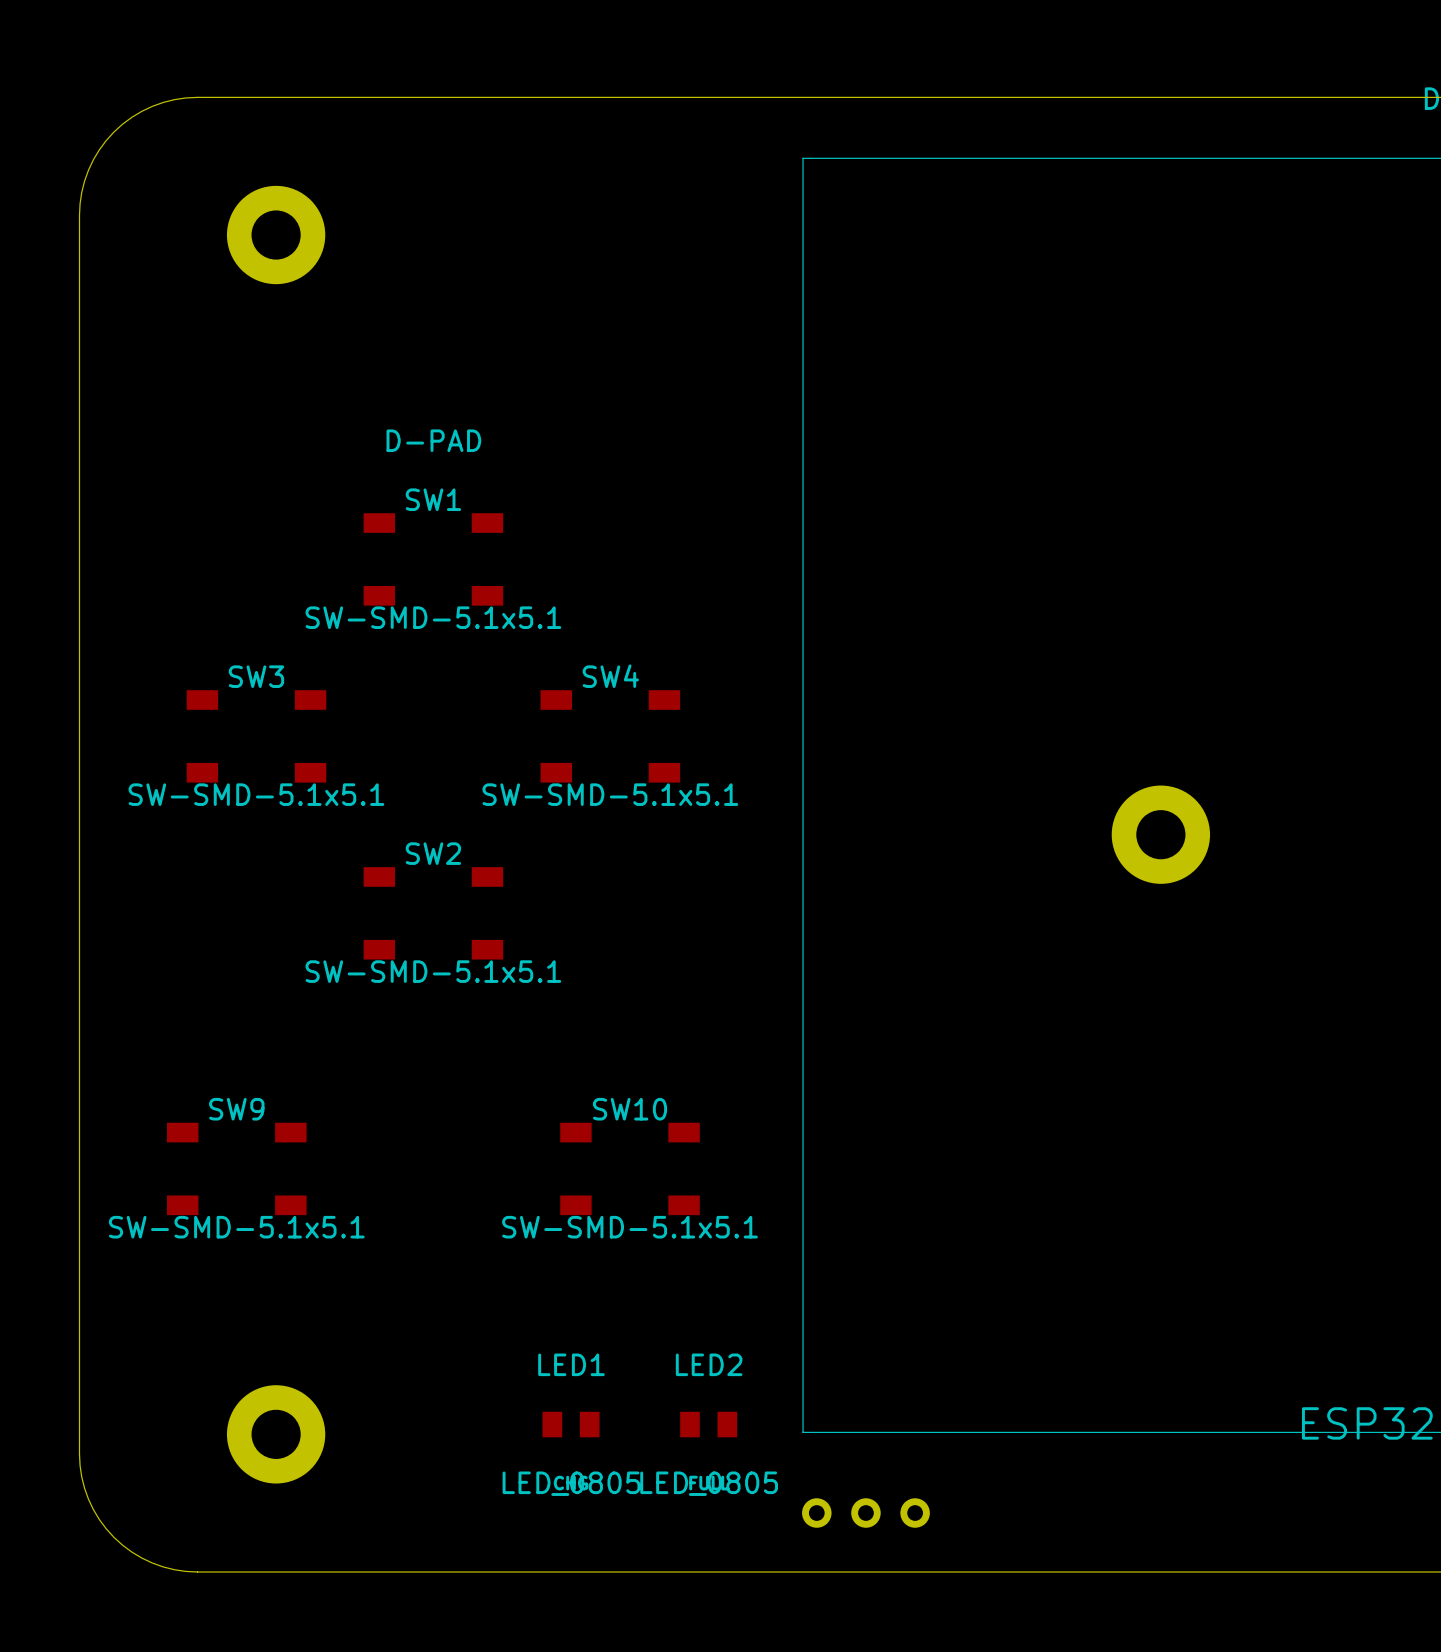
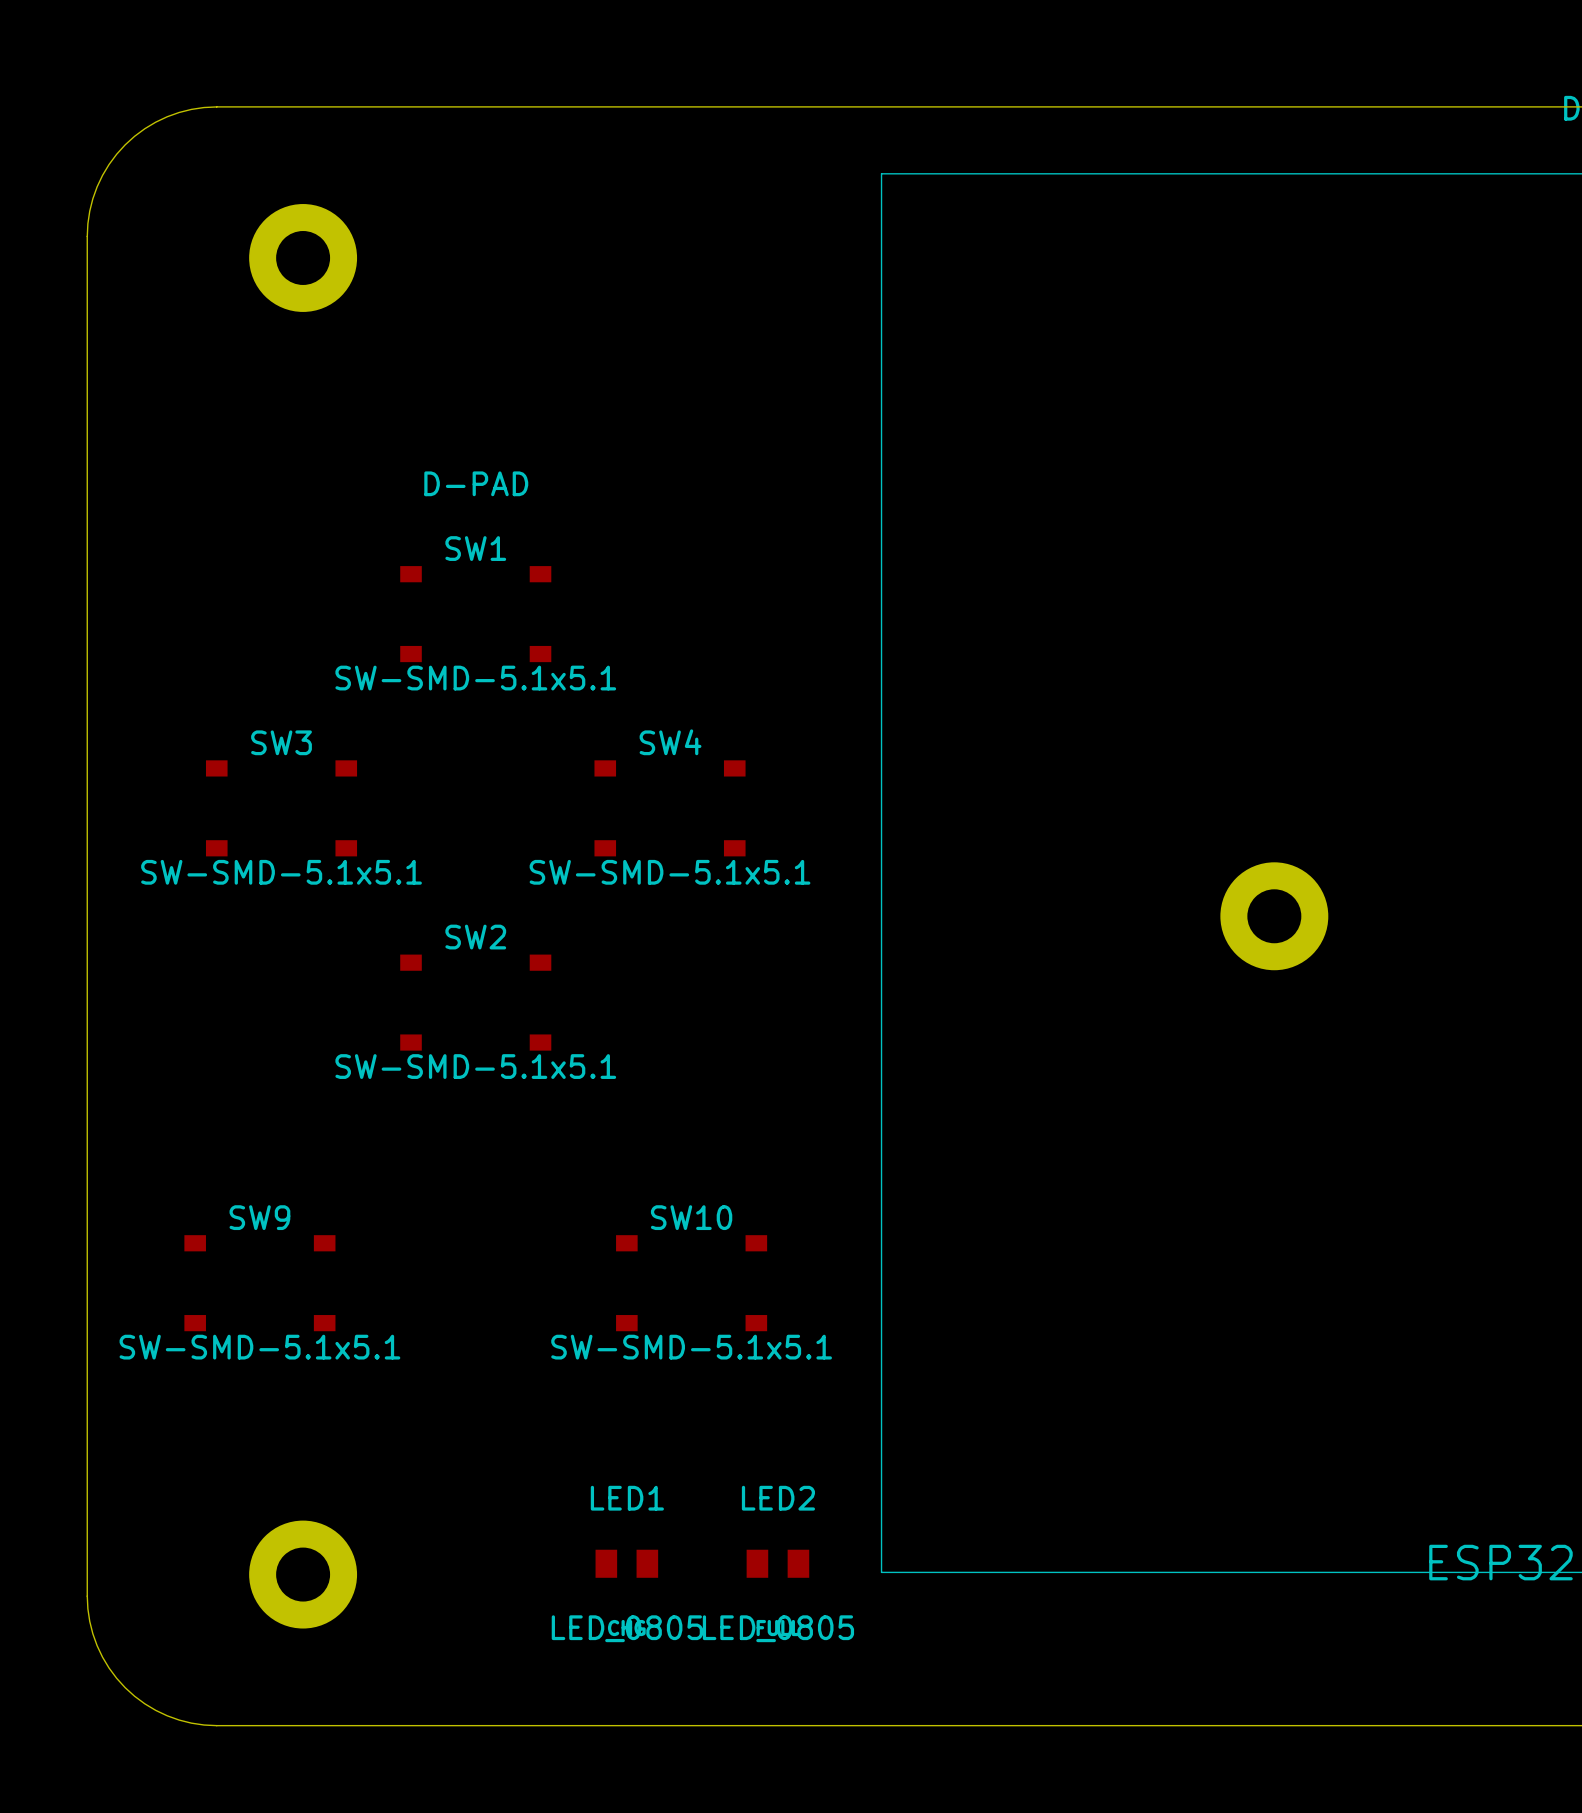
SW1 footprint: [363, 513, 504, 606] -> [400, 566, 552, 663]
SW3 footprint: [186, 690, 327, 783] -> [205, 760, 358, 857]
SW4 footprint: [540, 690, 681, 783] -> [594, 760, 746, 857]
SW2 footprint: [363, 867, 504, 960] -> [400, 954, 552, 1051]
SW9 footprint: [166, 1122, 307, 1216] -> [184, 1235, 336, 1332]
SW10 footprint: [560, 1122, 700, 1216] -> [616, 1235, 768, 1332]
part: (865, 1513) -> none

